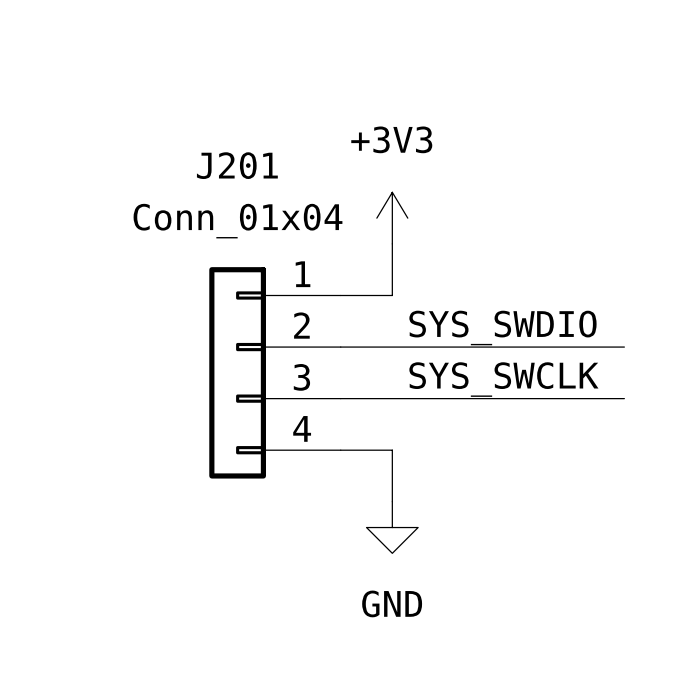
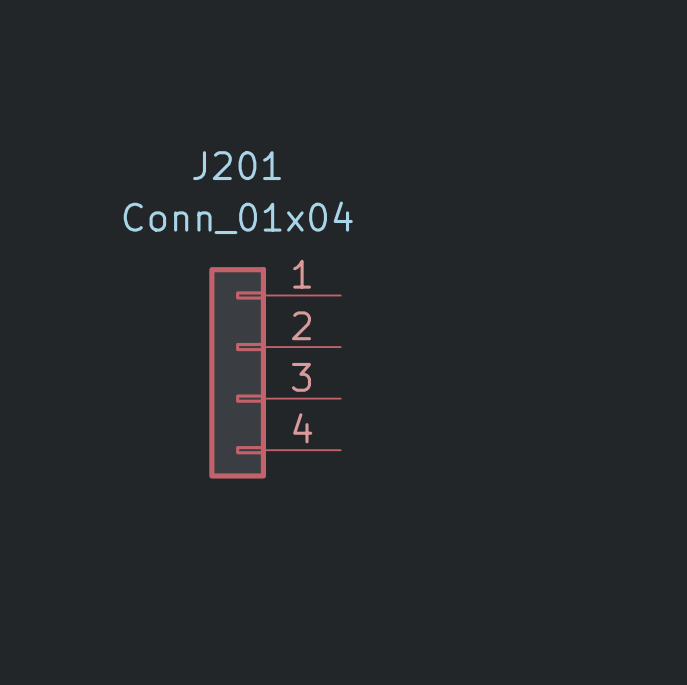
power symbol: +3V3 (392, 218) -> none
wire: (392, 243) (392, 295) (340, 295) -> none
label: SYS_SWDIO (502, 327) -> none
wire: (340, 347) (624, 347) -> none
label: SYS_SWCLK (503, 379) -> none
wire: (340, 398) (624, 398) -> none
wire: (340, 450) (392, 450) (392, 501) -> none
power symbol: GND (392, 527) -> none

